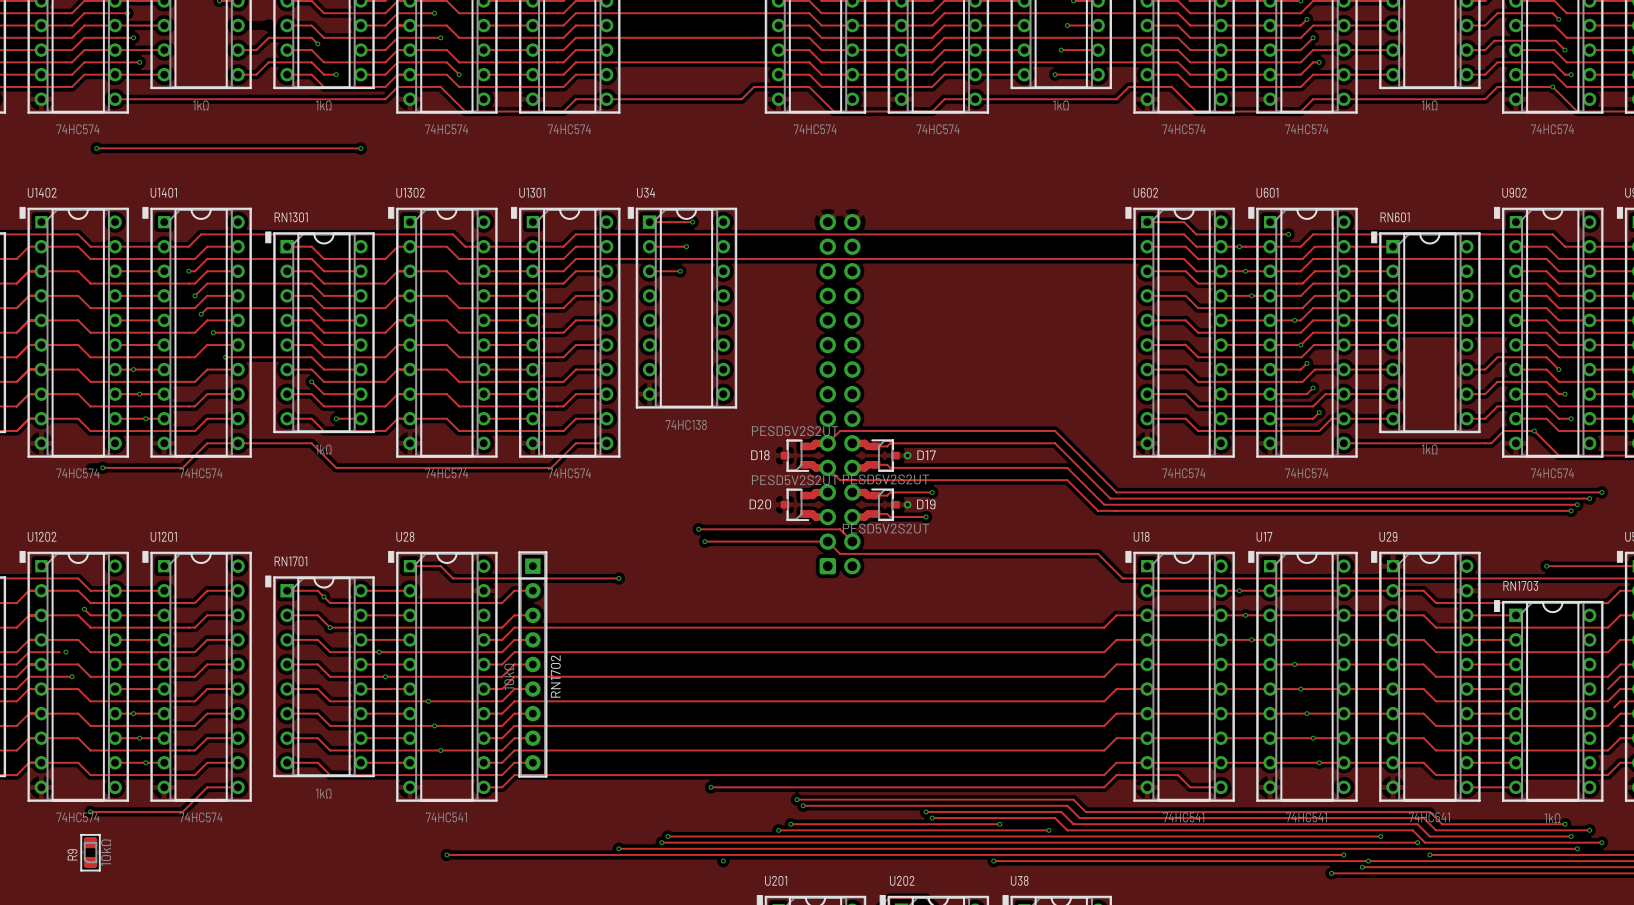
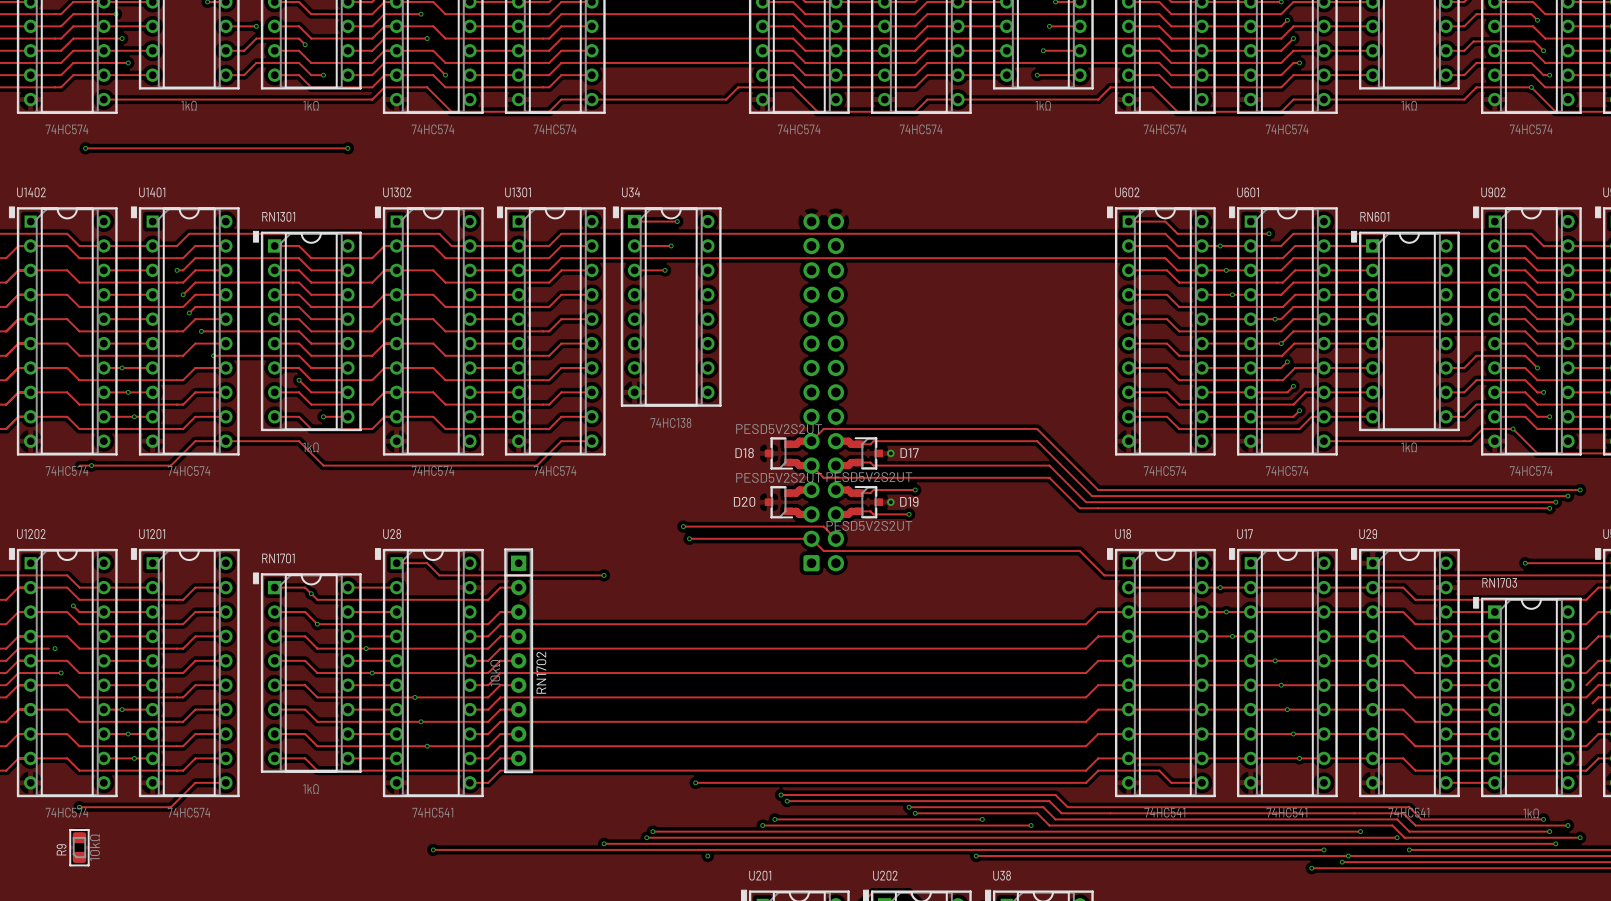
track: none -> (225, 26) (256, 26)
via: none -> (256, 26)
track: none -> (79, 465) (91, 465)

